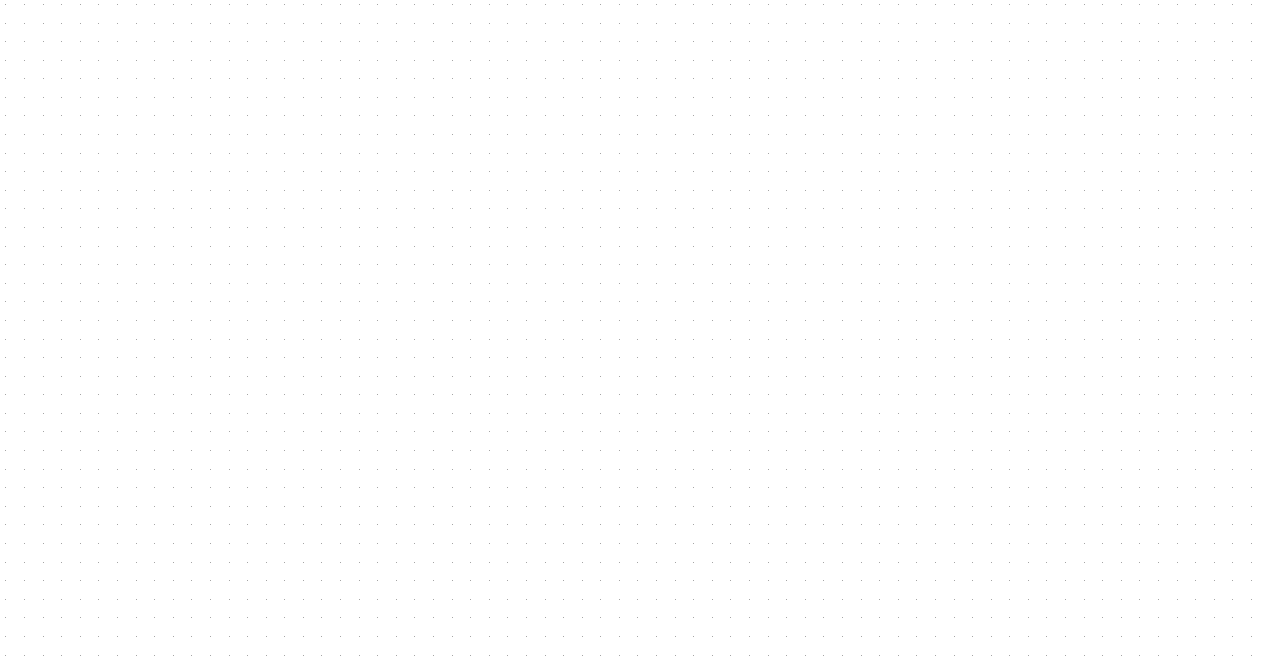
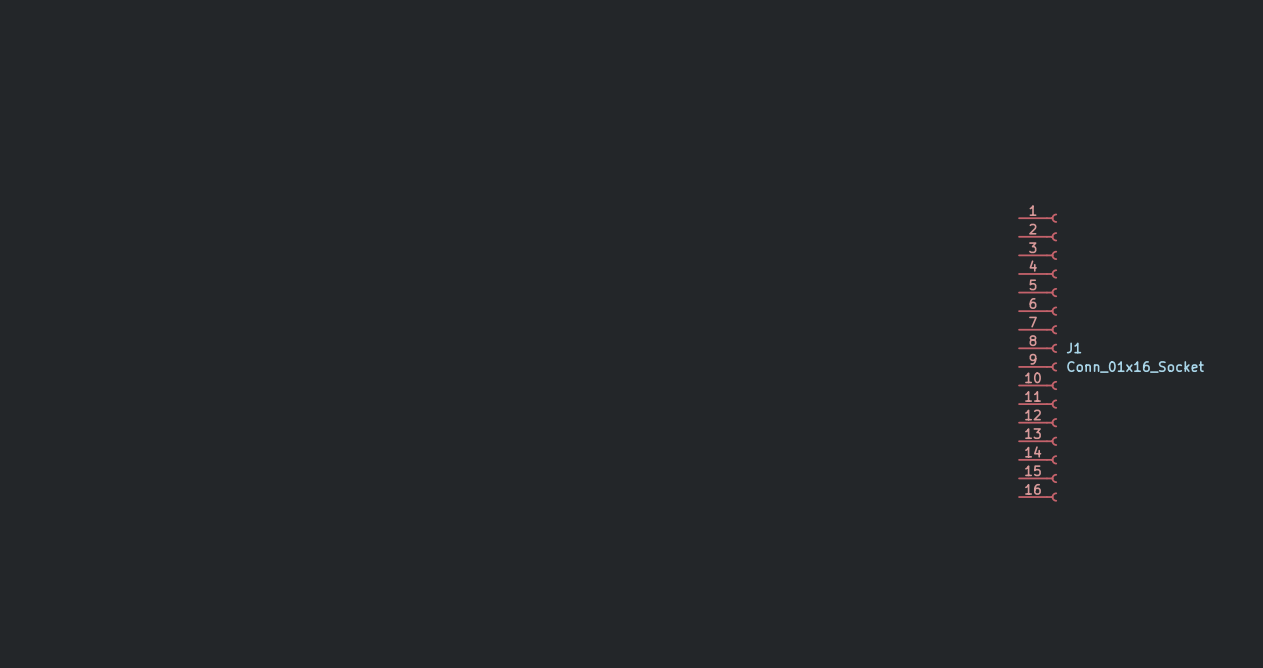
J1: none -> Conn_01x16_Socket (1037, 357)

